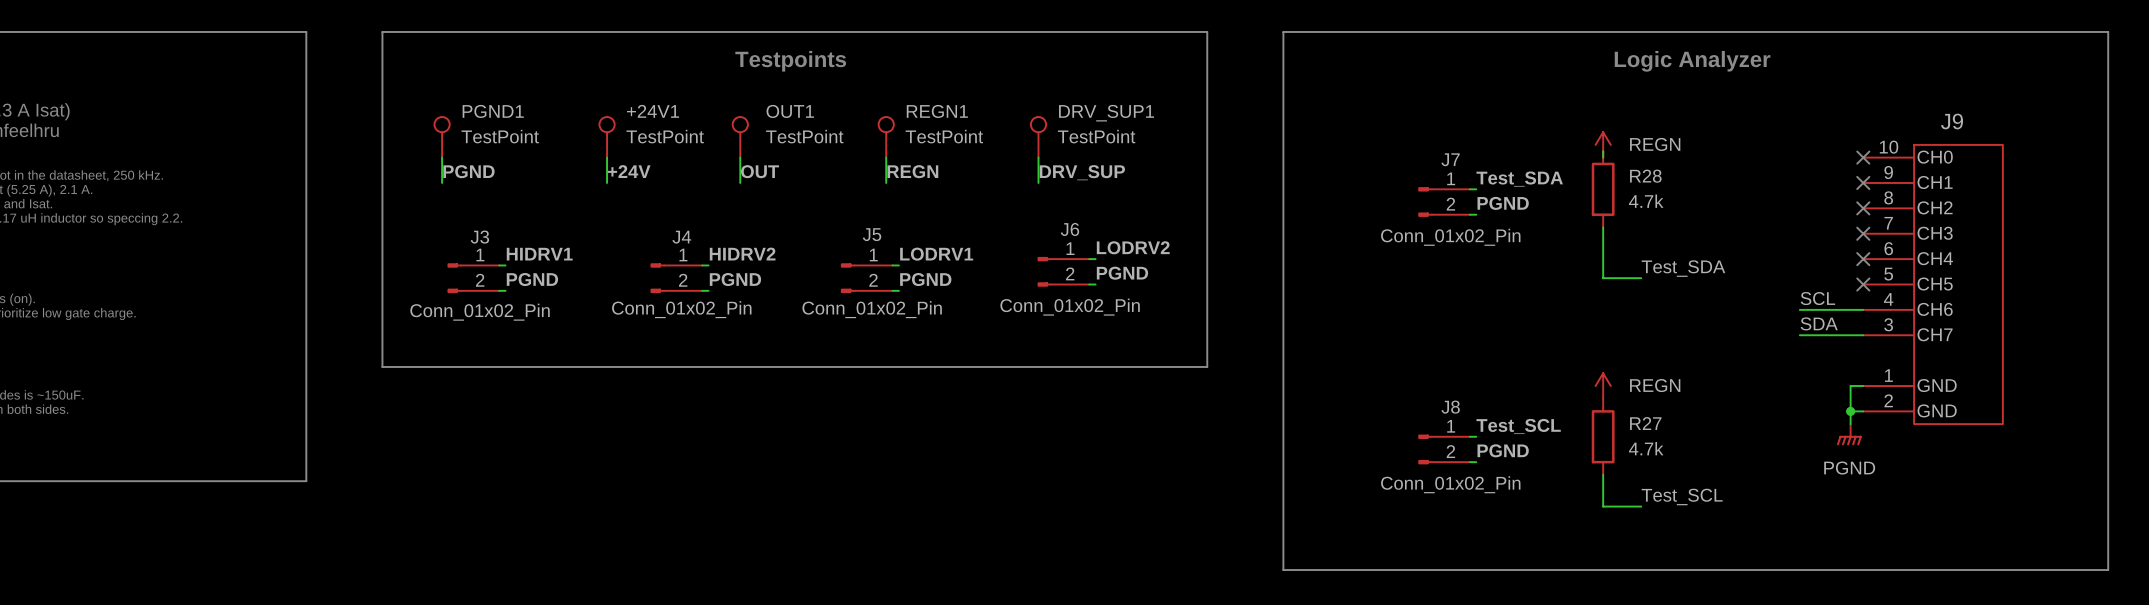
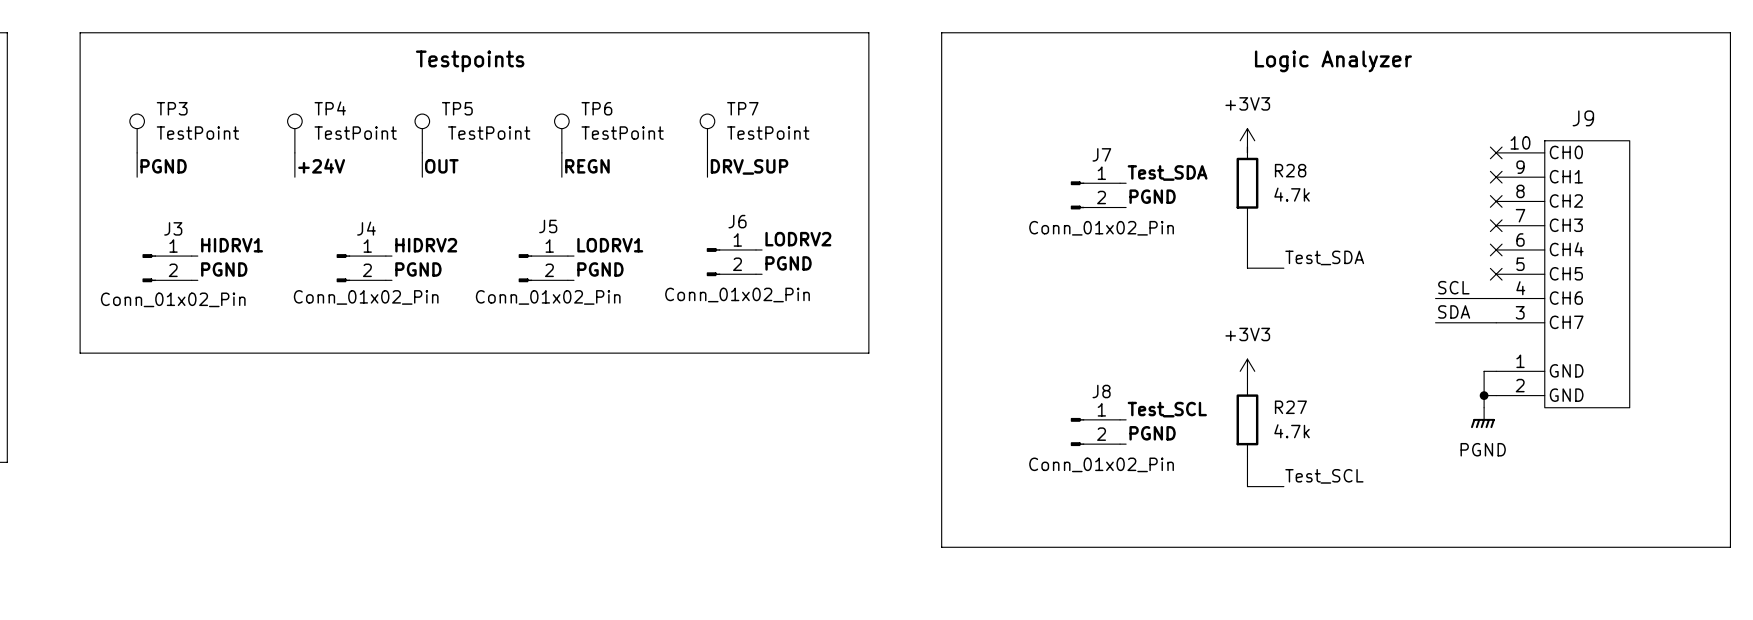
PGND1 name: PGND1 (493, 111) -> TP3 (172, 108)
+24V1 name: +24V1 (653, 111) -> TP4 (330, 108)
OUT1 name: OUT1 (790, 111) -> TP5 (457, 108)
REGN1 name: REGN1 (937, 111) -> TP6 (596, 108)
DRV_SUP1 name: DRV_SUP1 (1106, 113) -> TP7 (742, 108)
power symbol: REGN (1603, 144) -> +3V3 (1247, 140)
power symbol: REGN (1603, 386) -> +3V3 (1247, 371)

